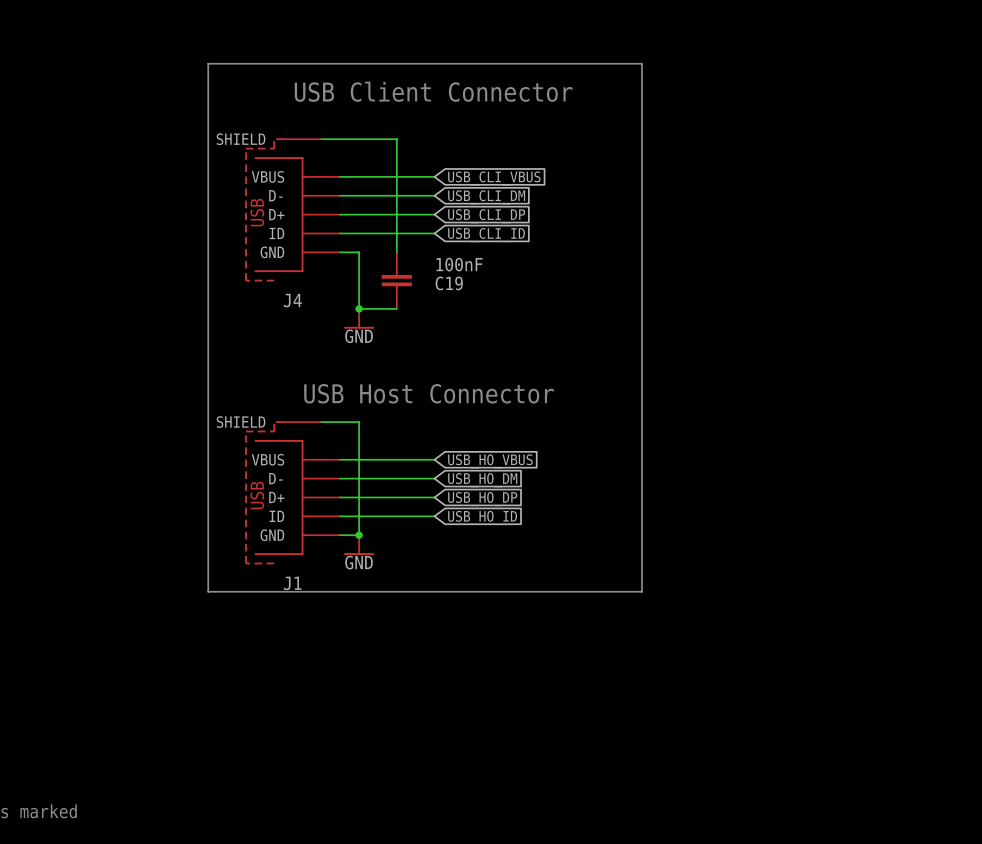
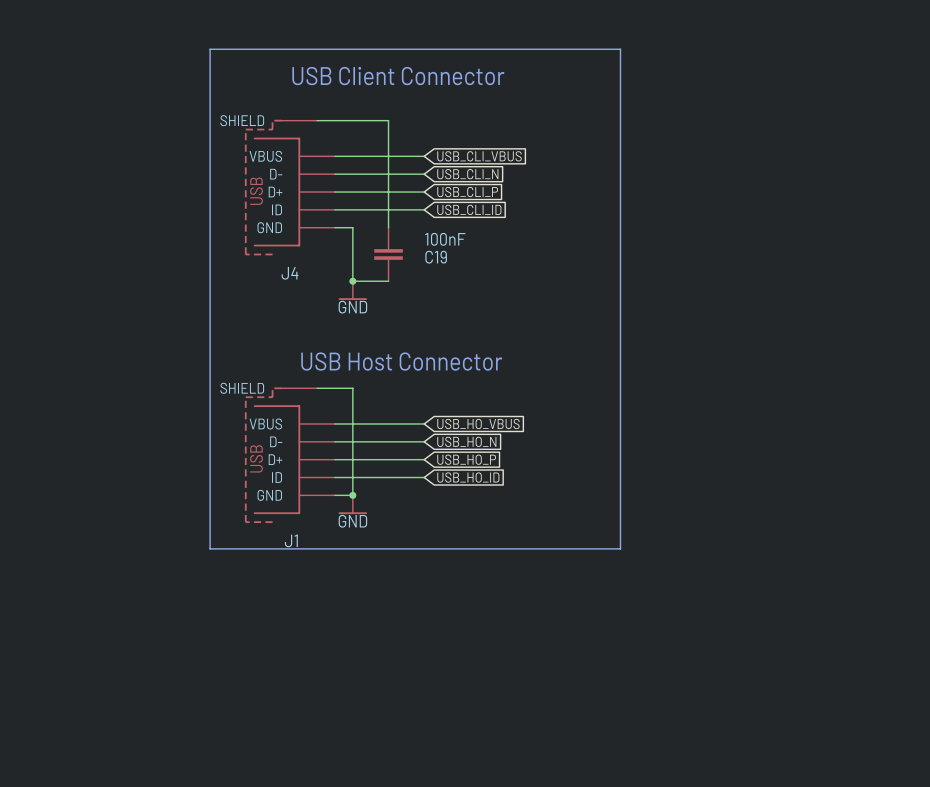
global label: USB_CLI_DM (486, 197) -> USB_CLI_N (467, 174)
global label: USB_CLI_DP (486, 216) -> USB_CLI_P (467, 192)
global label: USB_HO_DM (482, 480) -> USB_HO_N (466, 441)
global label: USB_HO_DP (482, 499) -> USB_HO_P (466, 459)

